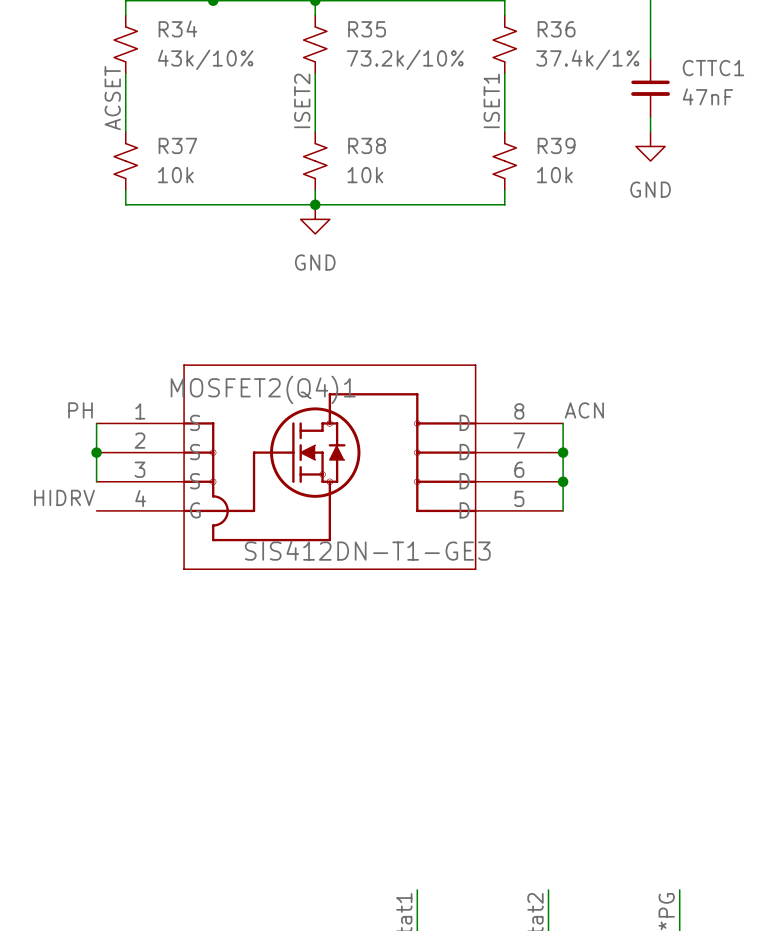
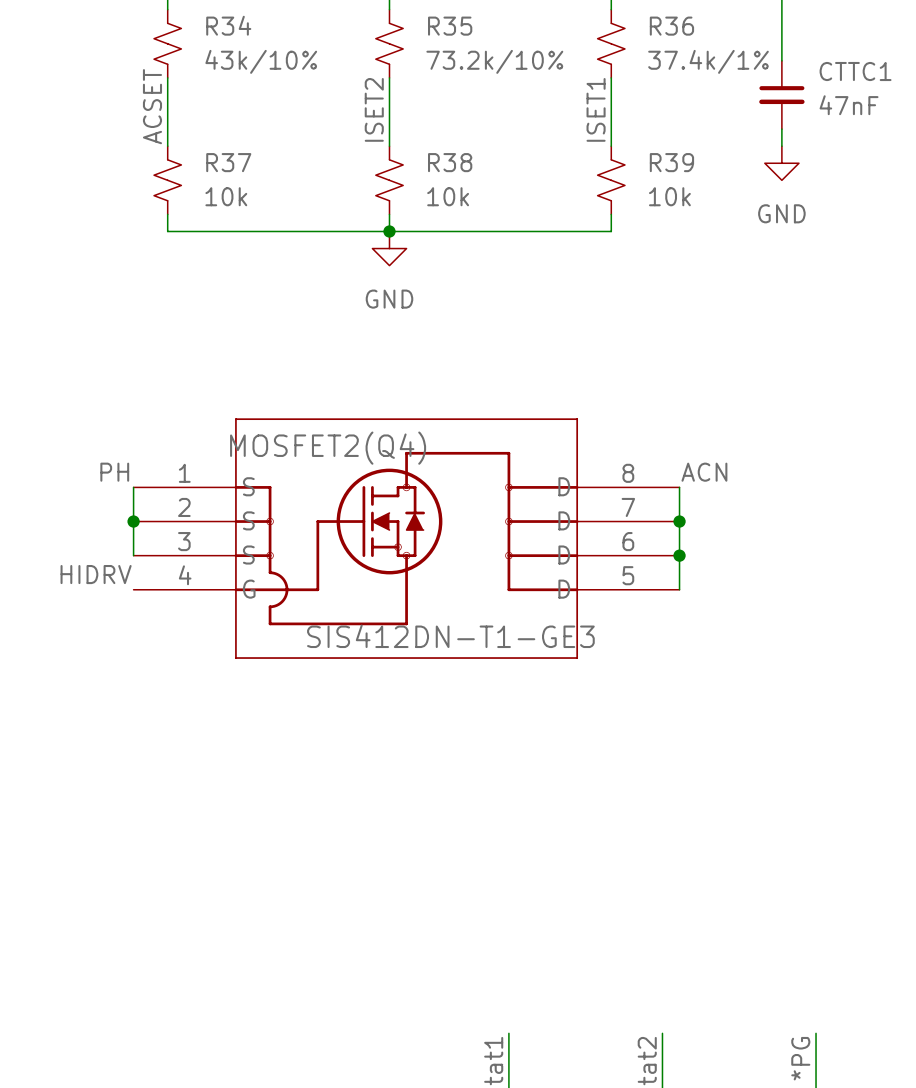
MOSFET2(Q4)1 name: MOSFET2(Q4)1 (263, 389) -> MOSFET2(Q4) (328, 448)

